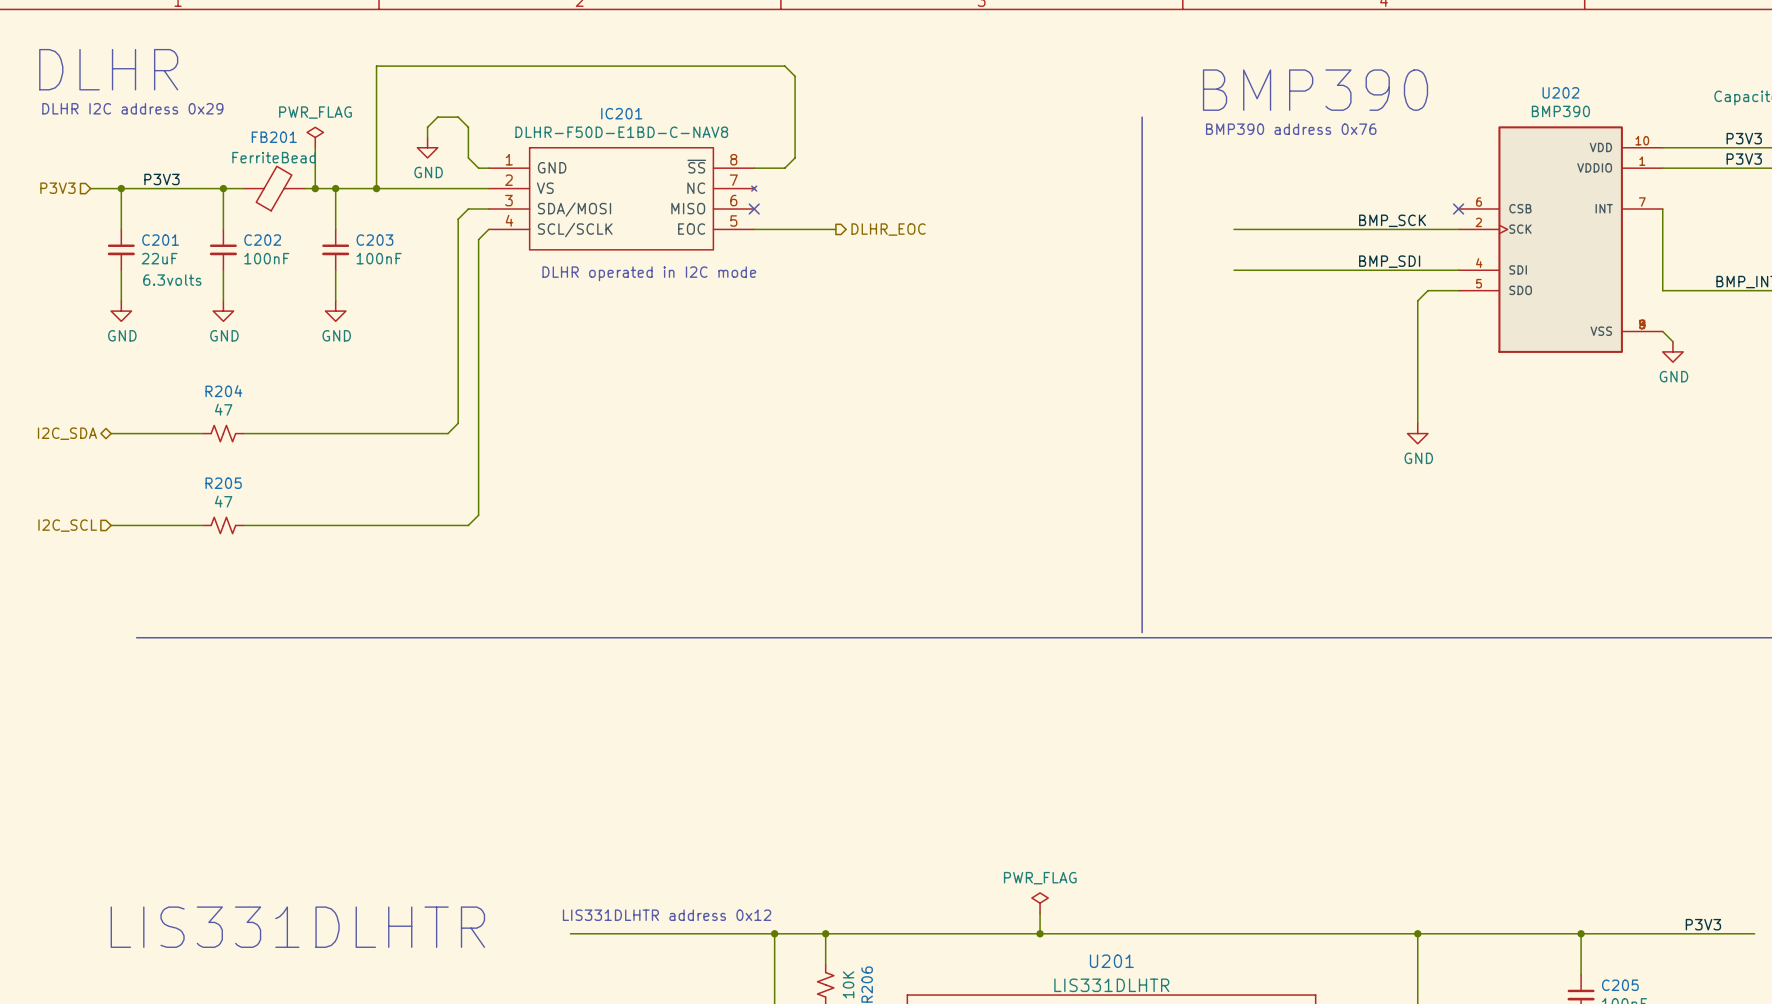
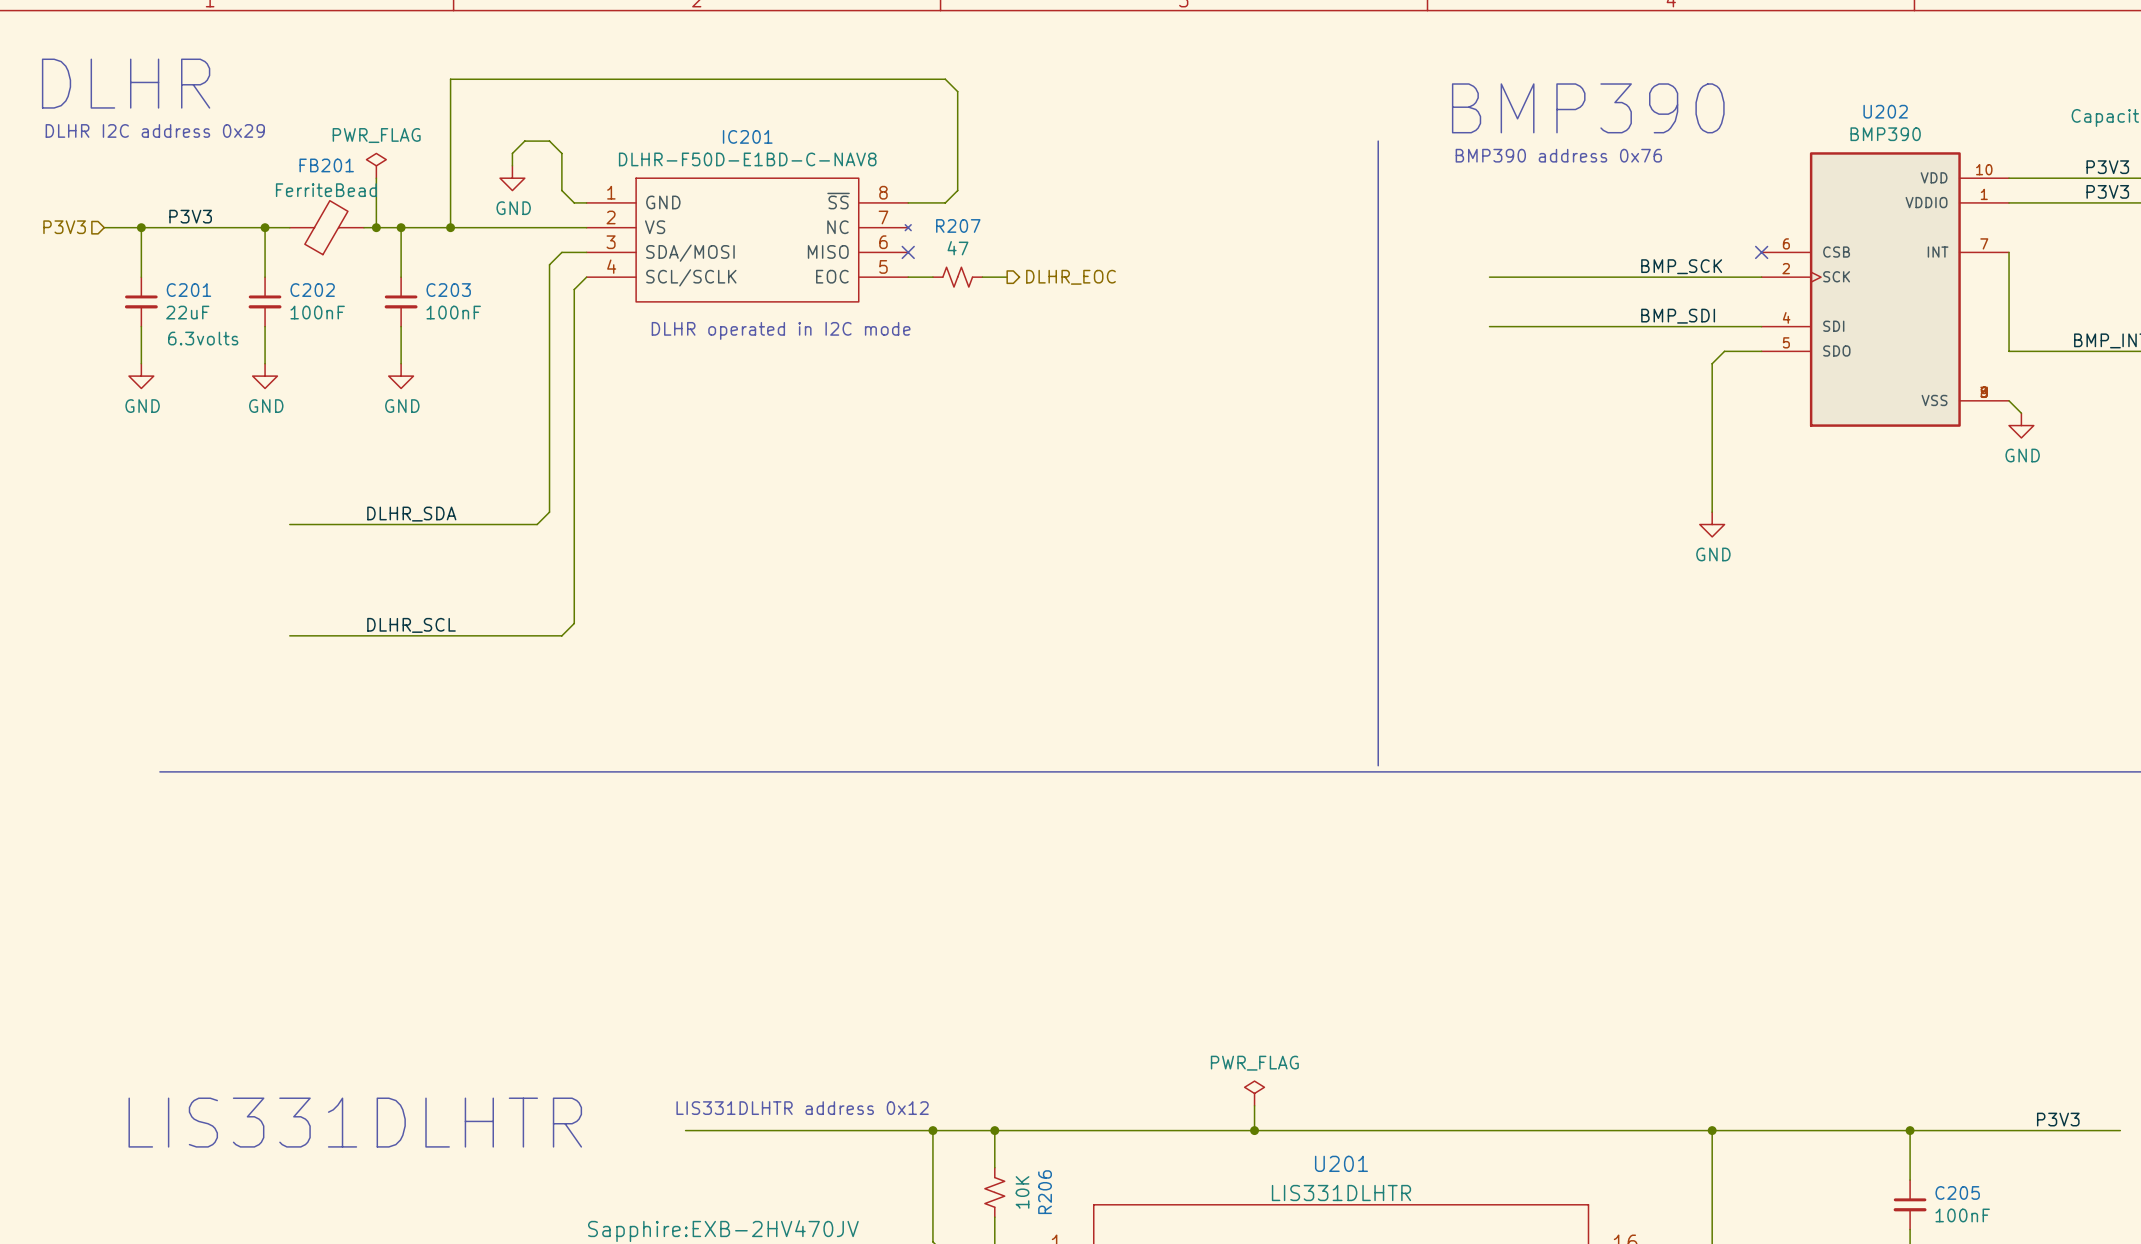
R207: none -> 47 (957, 277)
label: none -> DLHR_SDA (411, 514)
hierarchical label: I2C_SDA (67, 433) -> none
wire: (111, 433) (202, 433) -> none
R204: 47 (223, 433) -> none
label: none -> DLHR_SCL (411, 625)
hierarchical label: I2C_SCL (67, 525) -> none
wire: (111, 525) (202, 525) -> none
R205: 47 (223, 525) -> none

